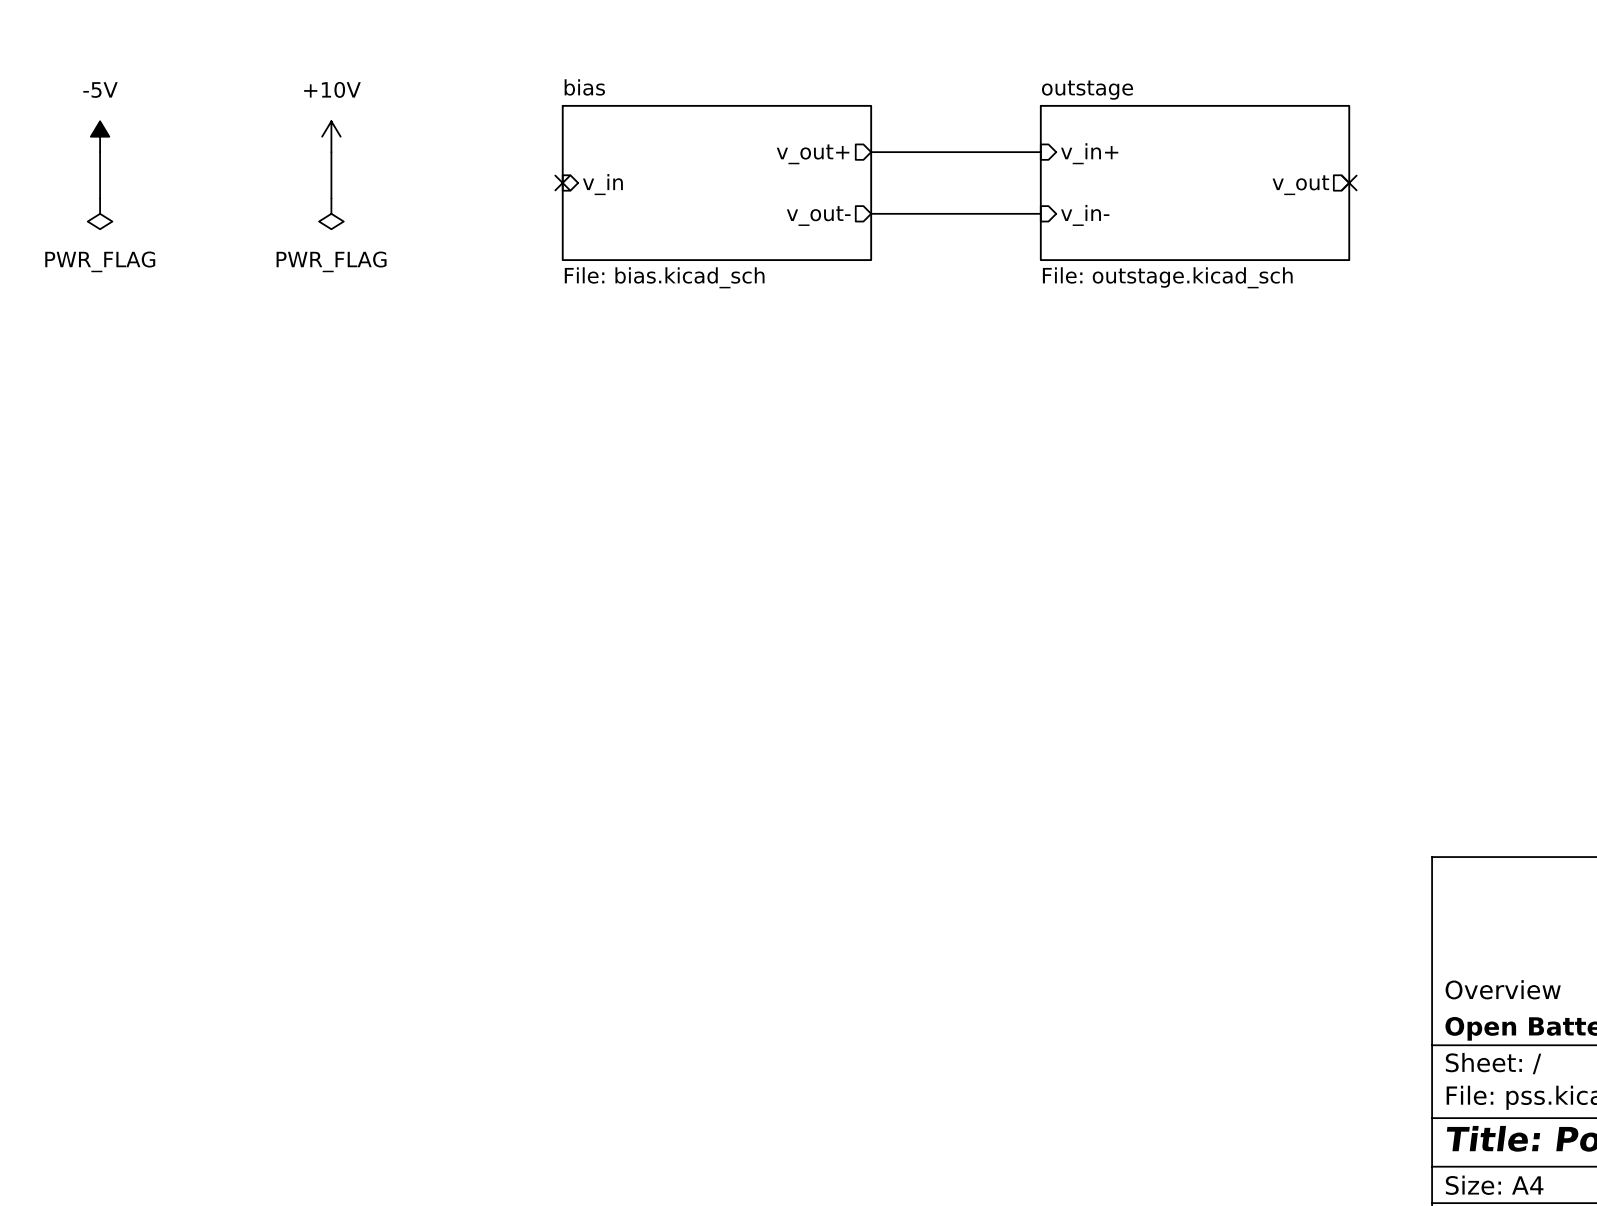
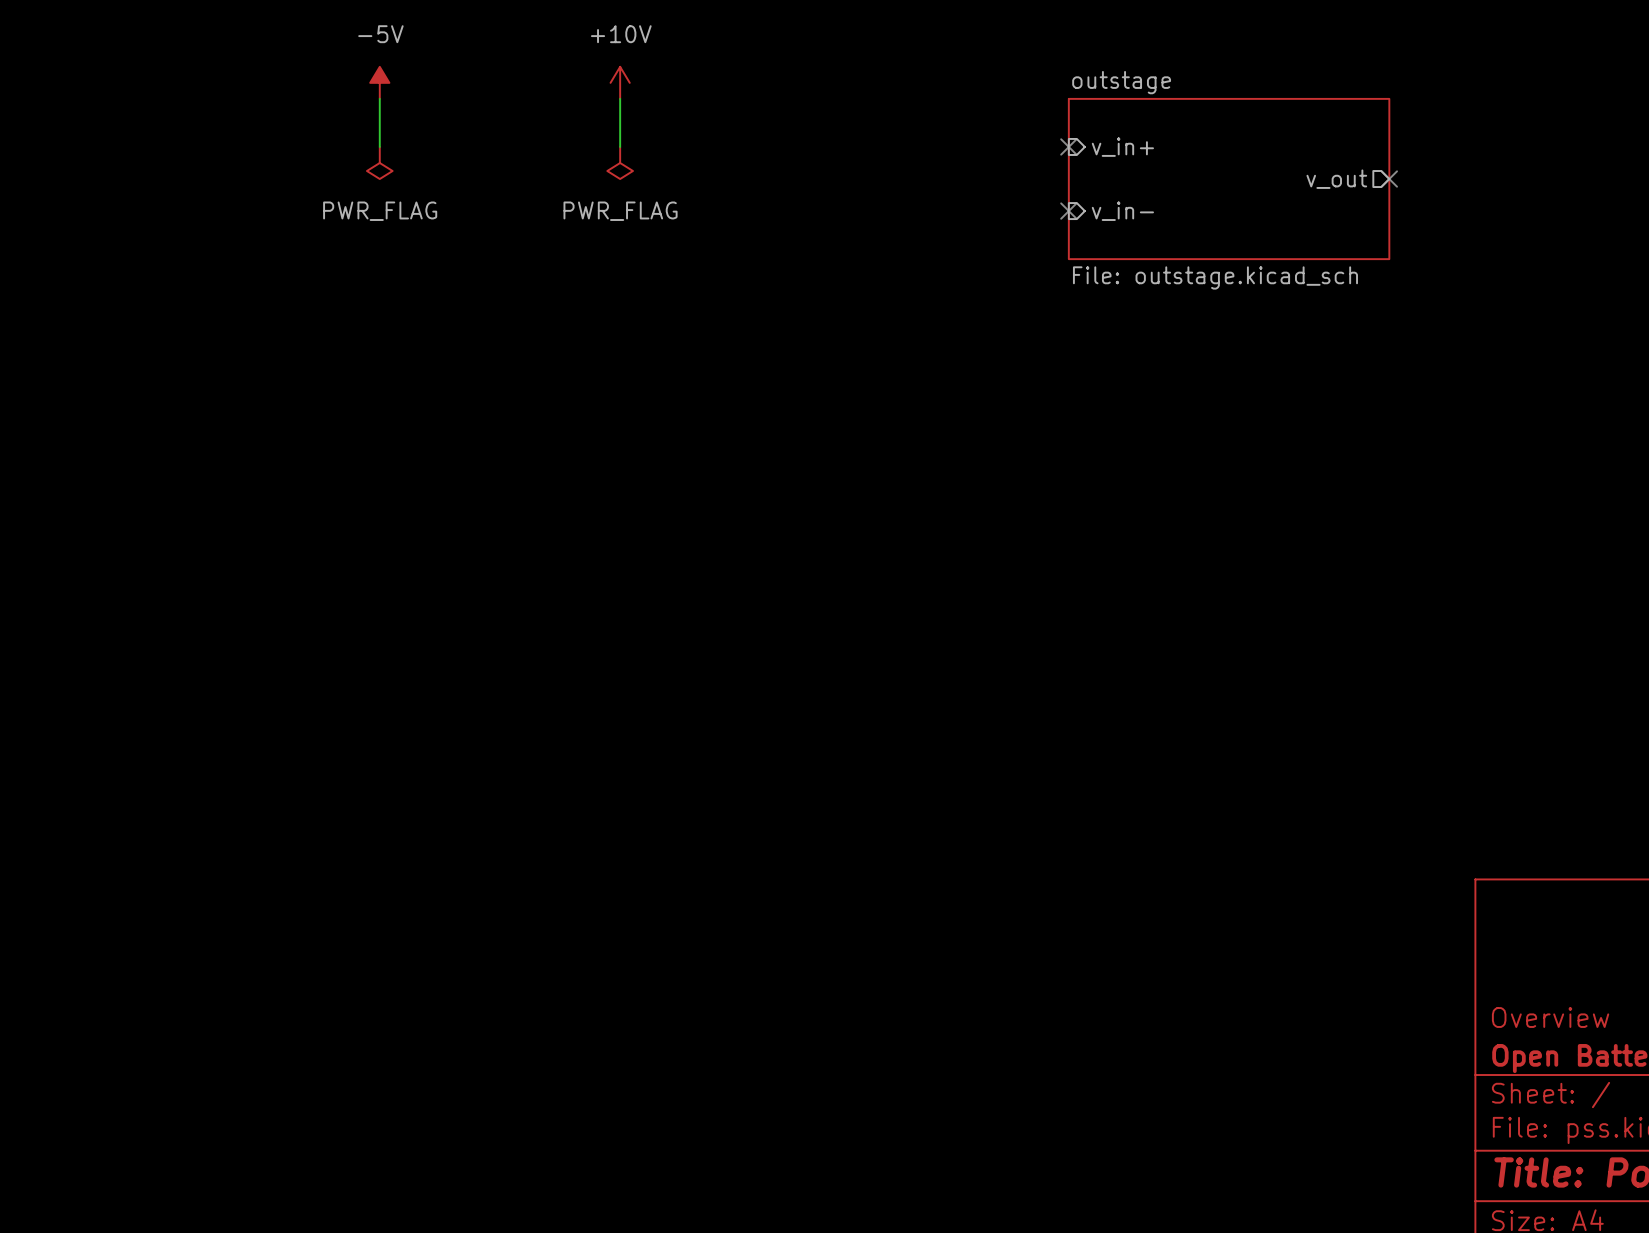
power symbol position: -5V (100, 136) -> -5V (379, 82)
power symbol position: +10V (331, 136) -> +10V (620, 82)
wire: (100, 152) (100, 198) -> (379, 98) (379, 146)
wire: (331, 152) (331, 198) -> (620, 98) (620, 146)
wire: (871, 152) (1040, 152) -> none
no-connect mark: none -> (1068, 146)
sheet pin: v_out+ (813, 154) -> none
power symbol: none -> PWR_FLAG (620, 162)
no-connect mark: (562, 182) -> none
sheet bias: File: bias.kicad_sch (716, 182) -> none
sheet pin: v_in (602, 184) -> none
power symbol: PWR_FLAG (100, 213) -> none
power symbol position: PWR_FLAG (331, 213) -> PWR_FLAG (379, 162)
wire: (871, 213) (1040, 213) -> none
no-connect mark: none -> (1068, 211)
sheet pin: v_out- (818, 216) -> none

